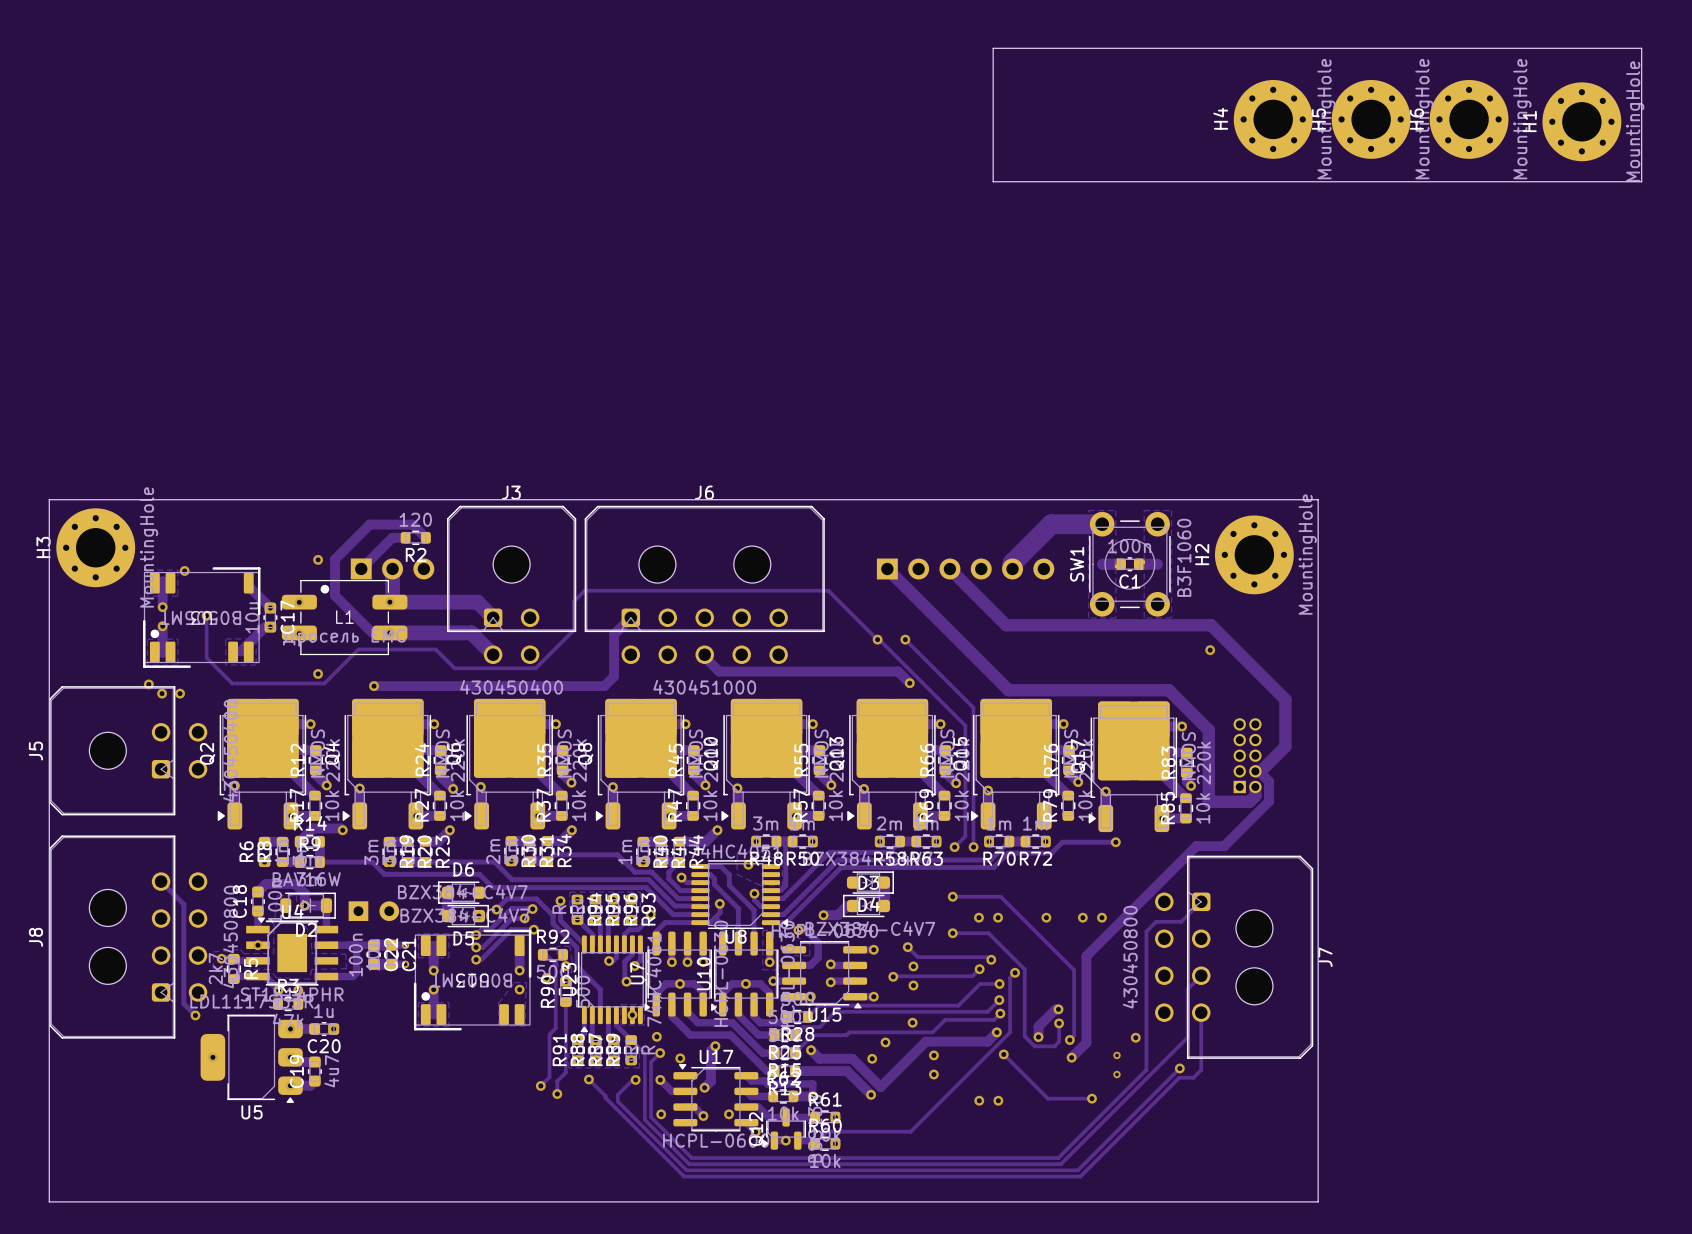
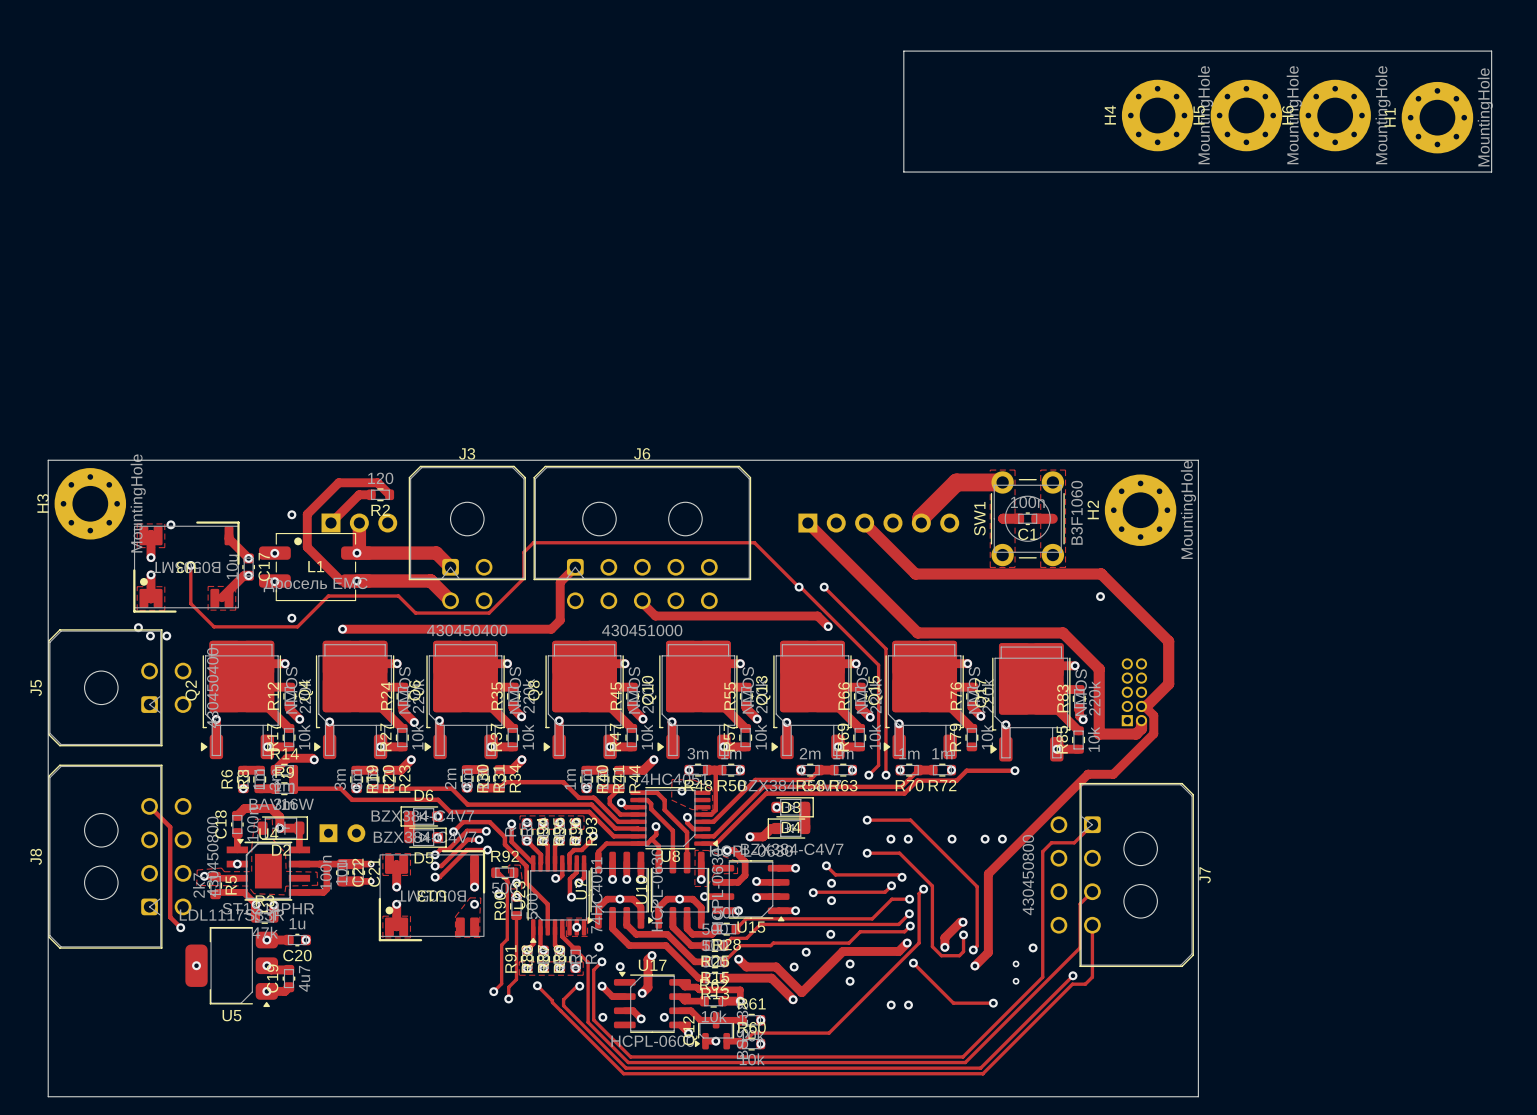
via: none -> (776, 807)
via: none -> (437, 816)

